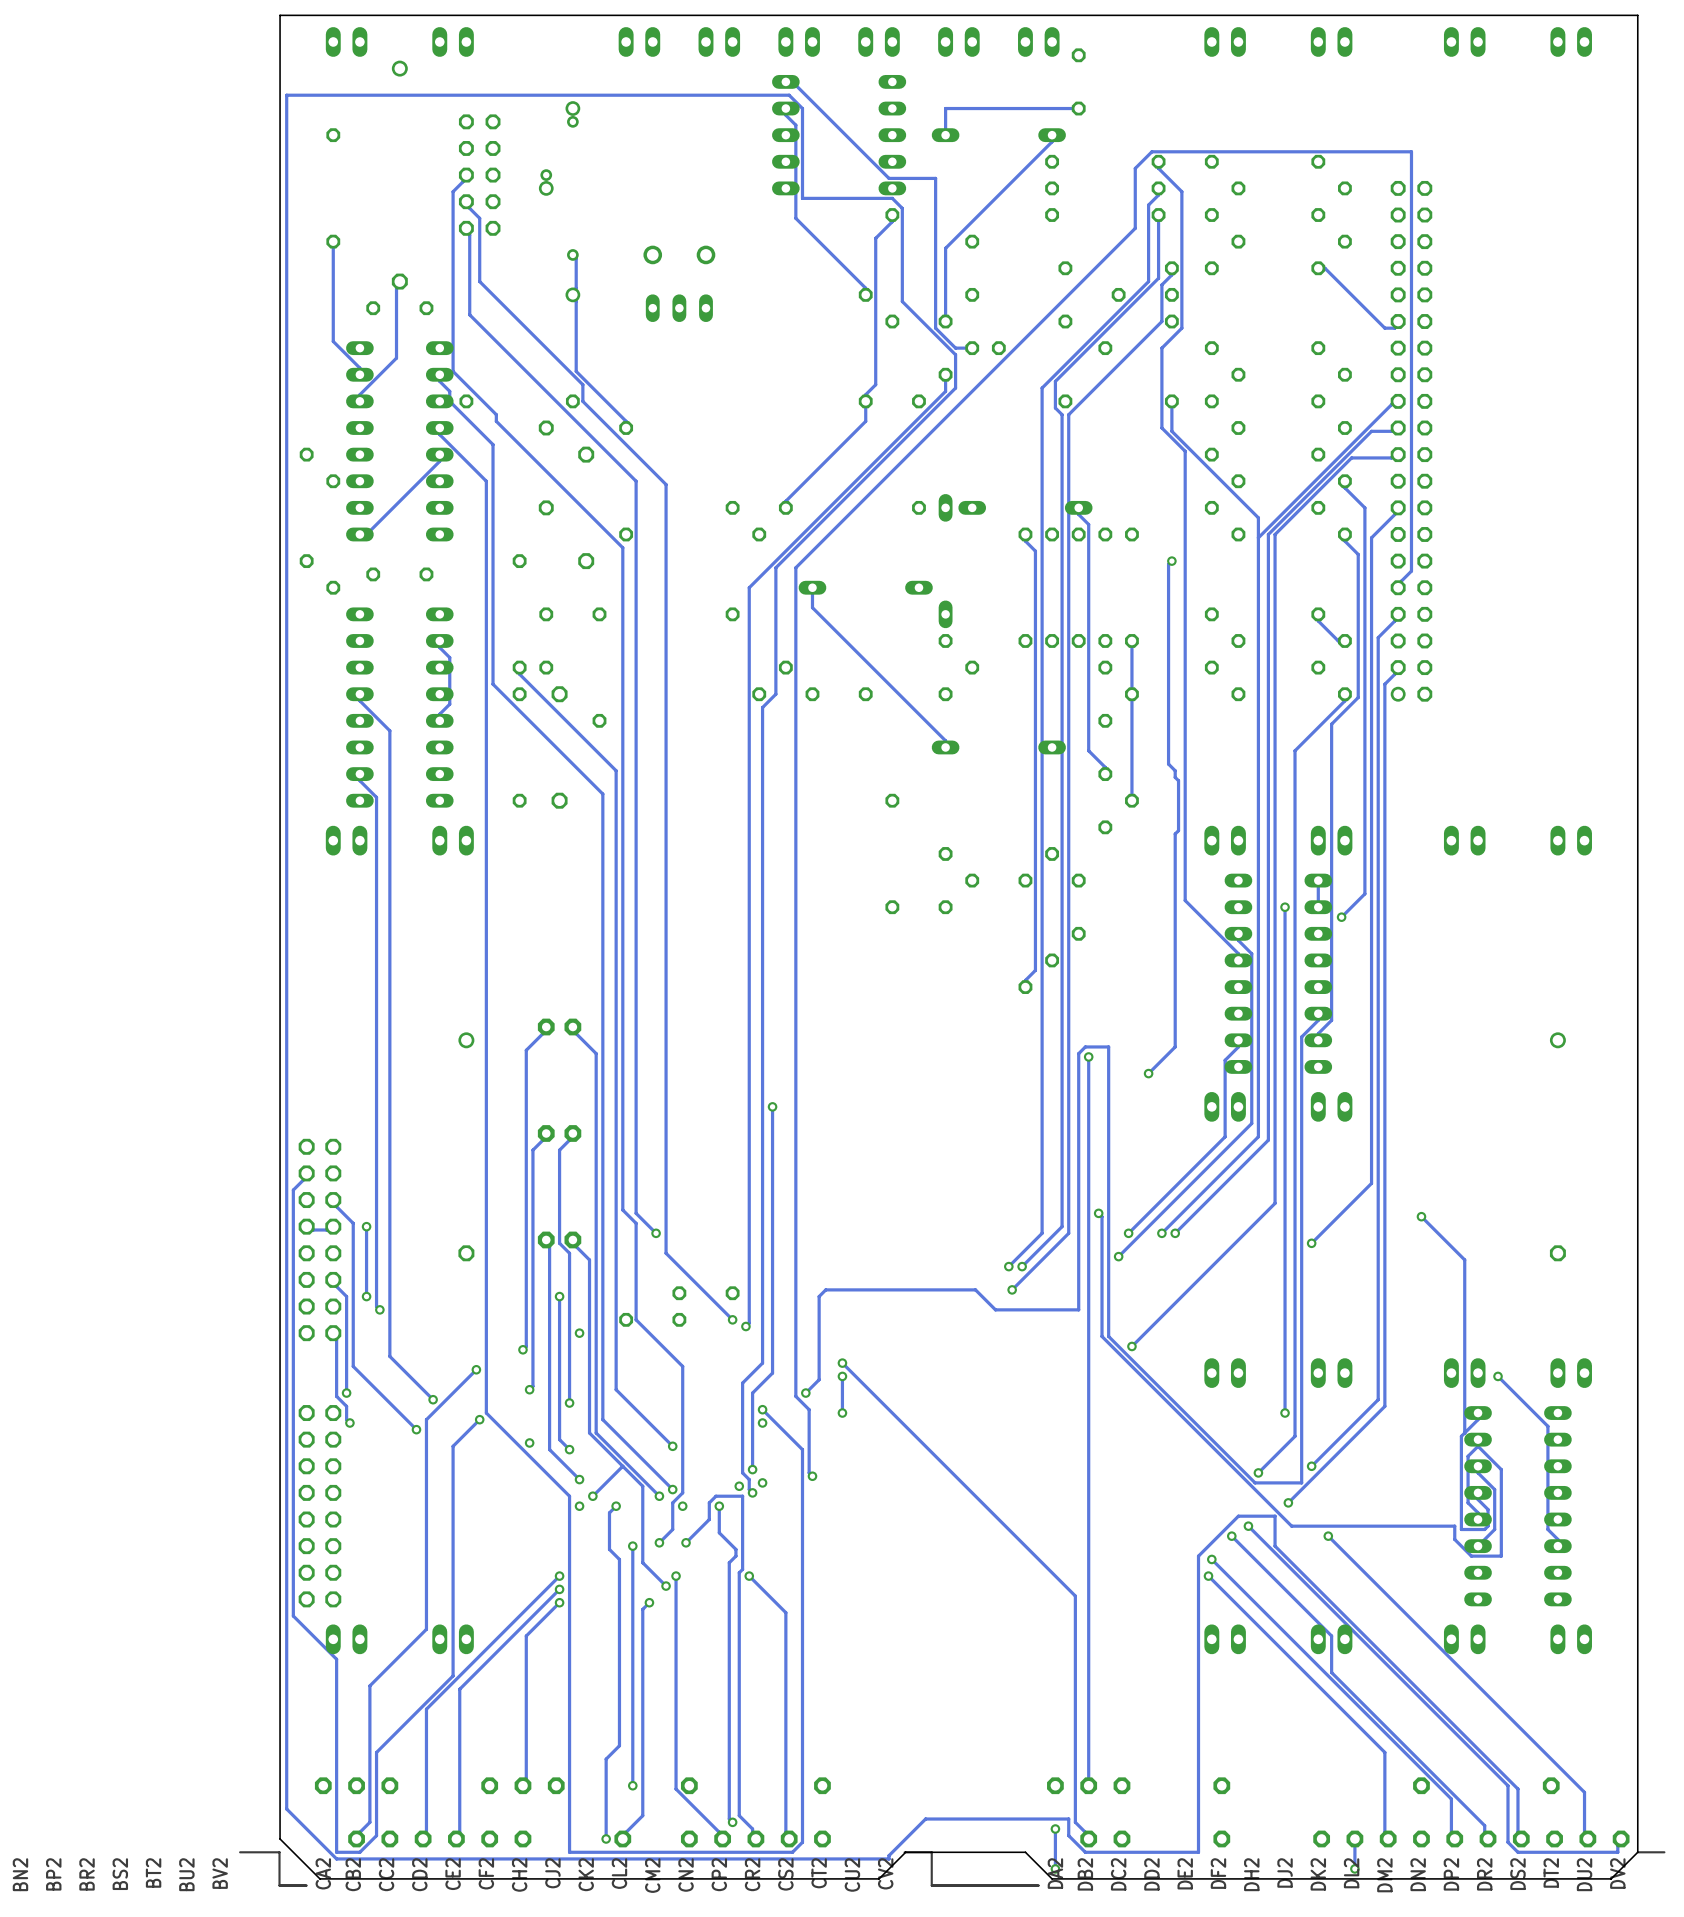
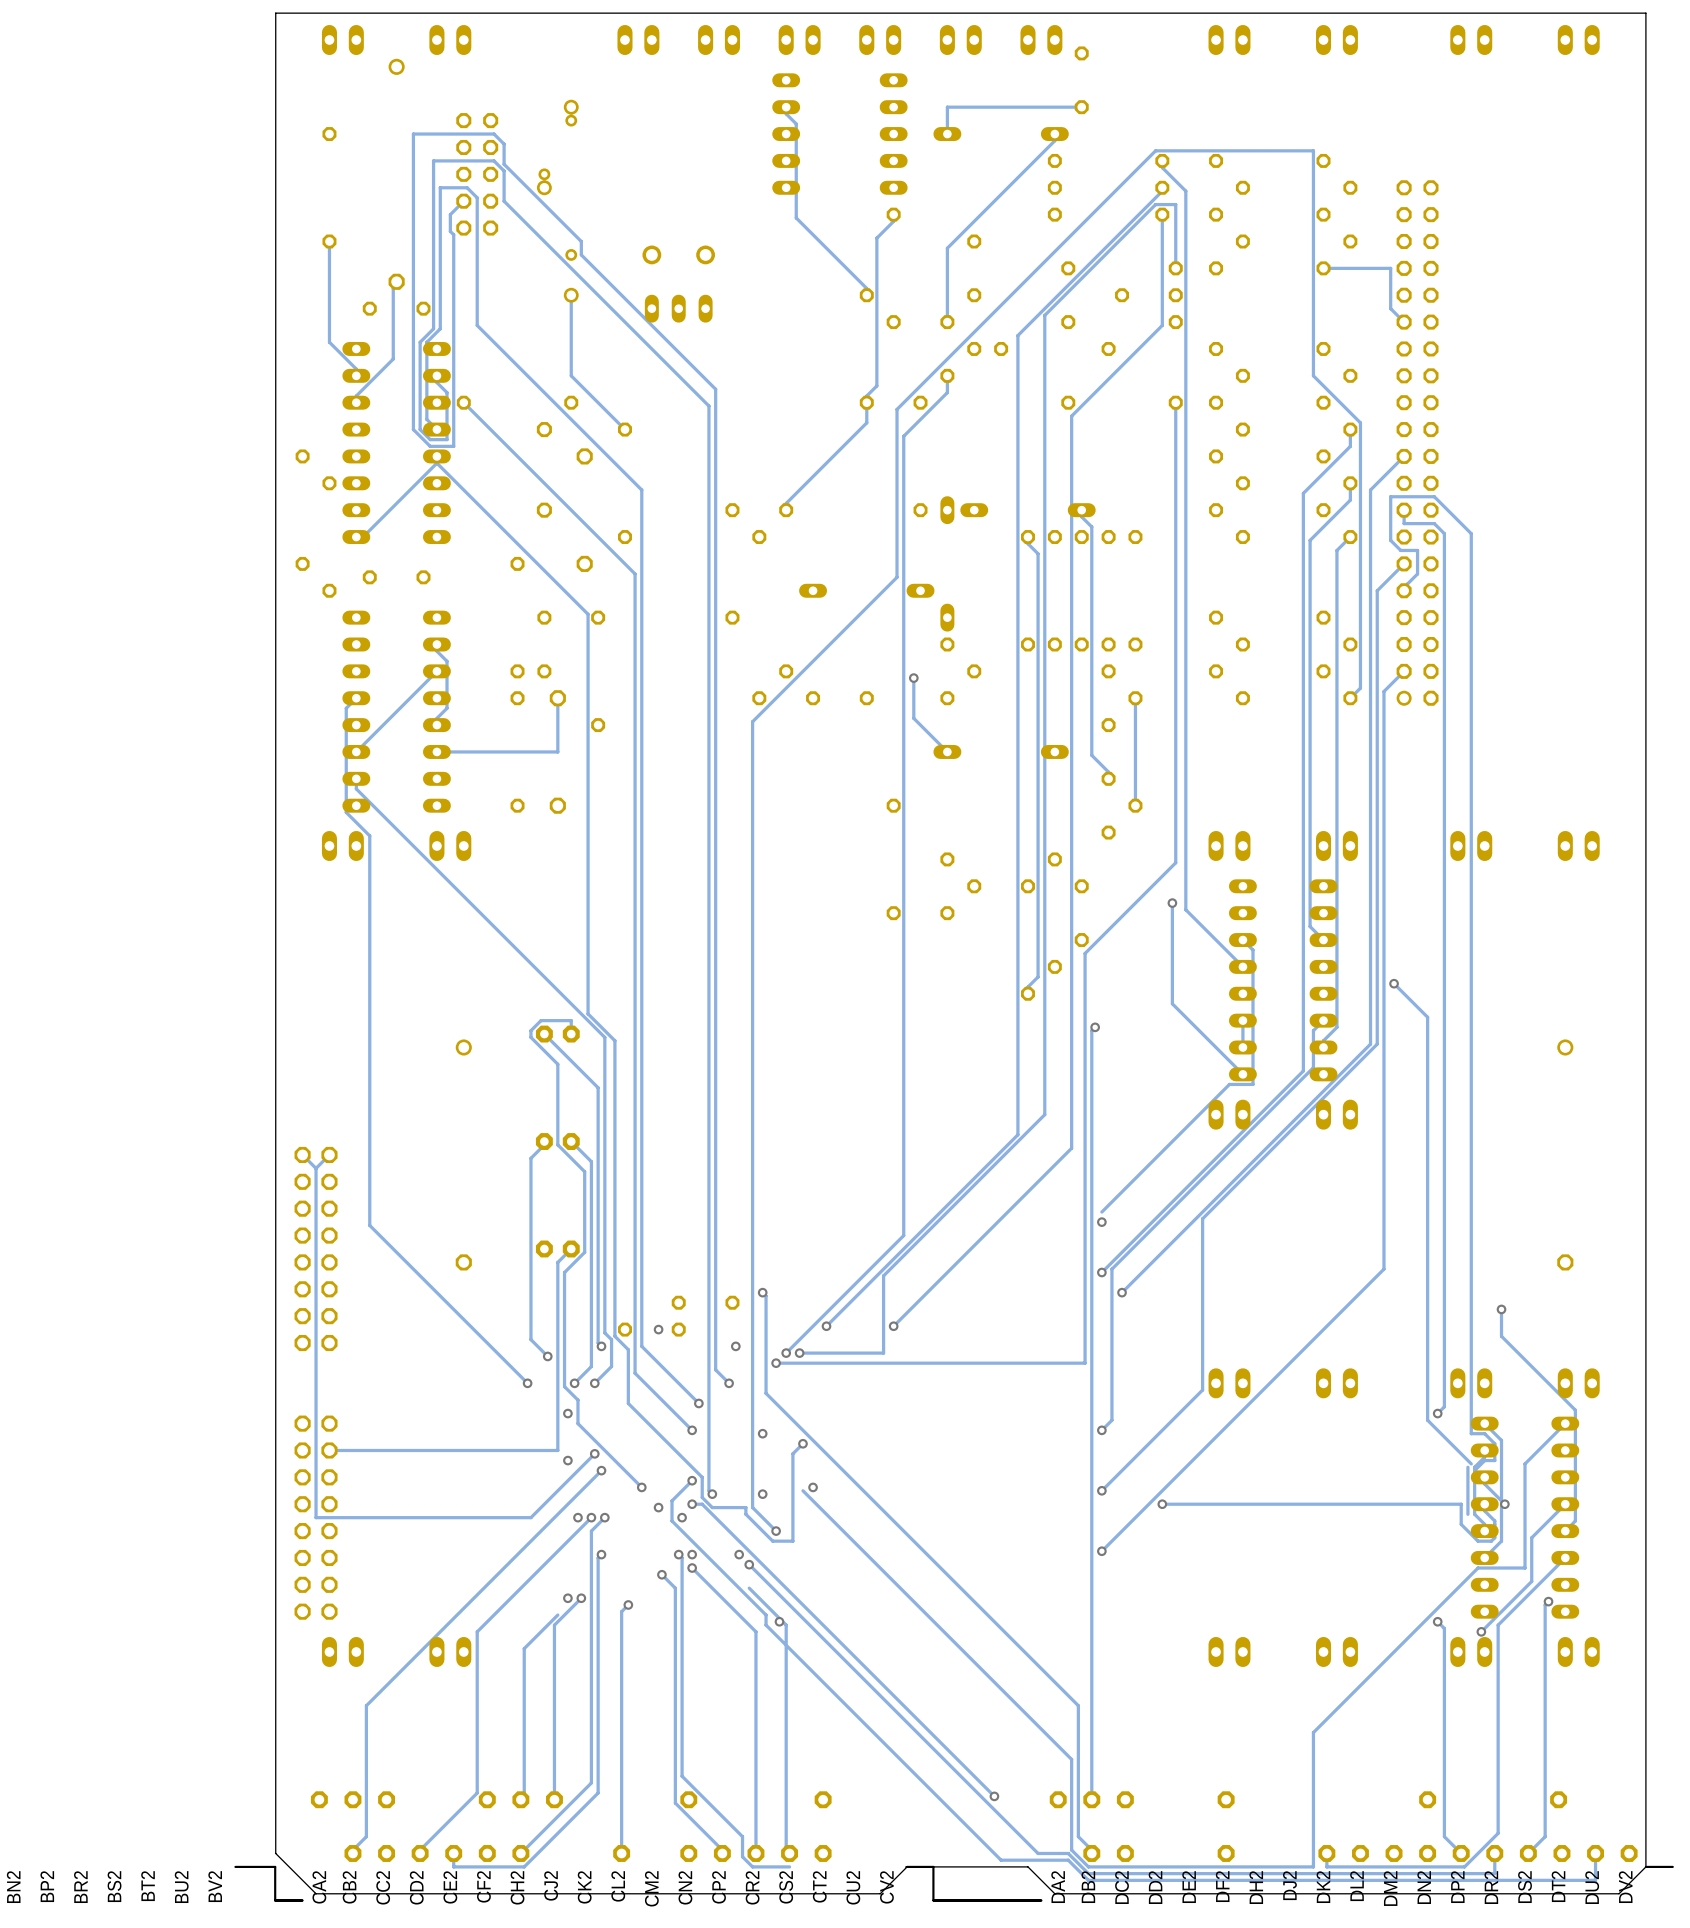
track: (785, 81) (792, 81) (889, 178) (935, 178) (935, 328) (955, 348) (972, 348) -> none
track: (1308, 151) (1411, 151) (1411, 547) -> (1313, 150) (1313, 375) (1360, 422) (1360, 688) (1350, 698)
track: (1135, 168) (1135, 228) (795, 567) (795, 1396) (809, 1409) (809, 1472) (812, 1476) -> (1138, 167) (897, 409) (897, 577) (776, 698)
track: (466, 175) (463, 181) (453, 191) (453, 215) -> (463, 201) (450, 214)
track: (1158, 191) (1158, 195) (1148, 205) (1148, 281) (1042, 388) -> (1175, 268) (1175, 204) (1155, 204) (1044, 315) (1044, 389)
track: none -> (1162, 191) (1017, 335) (1017, 1134) (826, 1326)
track: (466, 201) (469, 208) (479, 218) -> (436, 429) (426, 419) (426, 342) (440, 328) (440, 187) (467, 187) (477, 197) (477, 217)
track: (466, 228) (469, 234) (469, 314) (479, 324) -> (477, 281) (477, 325)
track: (453, 231) (453, 371) (496, 414) (496, 421) (622, 547) (622, 1210) (636, 1223) -> (450, 231) (453, 234) (453, 446) (430, 446) (413, 429) (413, 134) (494, 134) (504, 144) (504, 164) (581, 241) (581, 254) (715, 389) (715, 1369) (729, 1383)
track: (572, 254) (576, 258) (576, 288) (572, 294) (576, 301) (576, 371) (626, 421) (626, 428) -> (581, 385) (624, 429)
track: (1171, 268) (1171, 274) (1161, 284) (1161, 321) (1158, 324) -> (1162, 278) (1162, 325)
track: (1324, 268) (1384, 328) (1394, 328) (1398, 321) -> (1330, 268) (1390, 268) (1390, 308) (1404, 322)
track: (1158, 278) (1055, 381) (1055, 408) (1062, 414) (1062, 1226) (1022, 1266) -> none
track: (479, 281) (572, 374) -> (571, 295) (571, 375)
track: (1181, 328) (1161, 348) (1161, 428) (1185, 451) (1185, 900) (1238, 953) (1238, 960) -> (1185, 328) (1185, 909) (1242, 966)
track: (582, 384) (582, 401) (666, 484) (666, 1253) (732, 1319) -> none
track: (449, 401) (493, 444) (493, 684) (602, 794) (602, 1419) (672, 1489) -> (447, 402) (447, 439) (430, 439) (420, 429) (420, 342) (433, 328) (433, 160) (494, 160) (504, 170) (504, 201) (708, 406) (708, 1490) (712, 1494)
track: (1398, 401) (1391, 404) (1258, 537) -> none
track: (439, 428) (439, 434) (486, 481) (486, 1413) (569, 1496) (569, 1852) (752, 1852) -> (678, 1554) (682, 1557) (682, 1776) (742, 1836) (742, 1856) (752, 1866)
track: none -> (1350, 429) (1350, 446) (1303, 493) (1303, 1071) (1229, 1144)
track: (1398, 428) (1391, 431) (1371, 431) (1268, 534) (1268, 1140) -> none
track: (1171, 431) (1258, 517) (1258, 1136) (1161, 1233) -> (1175, 432) (1175, 862) (1085, 953) (1085, 1363) (776, 1363)
track: (902, 434) (749, 587) (749, 1323) (745, 1326) -> (903, 436) (903, 1235) (786, 1353)
track: (1398, 454) (1391, 457) (1351, 457) (1275, 534) (1275, 1203) (1131, 1346) -> none
track: (636, 481) (636, 571) -> (463, 402) (635, 573)
track: none -> (635, 483) (641, 490) (641, 1346) (698, 1403)
track: (1344, 487) (1364, 507) -> (1404, 456) (1370, 490) (1370, 510)
track: none -> (1350, 490) (1350, 500) (1310, 540) (1310, 926) (1323, 940)
track: (1398, 507) (1394, 514) (1371, 537) (1371, 587) -> (1404, 563) (1377, 590)
track: none -> (1404, 510) (1404, 523) (1434, 523) (1444, 533) (1444, 1406) (1437, 1413)
track: (1344, 534) (1344, 541) (1358, 554) (1358, 697) (1331, 724) -> (1350, 537) (1336, 550) (1336, 728)
track: (1171, 561) (1168, 564) (1168, 764) (1175, 770) (1175, 777) (1178, 780) (1178, 830) (1175, 833) (1175, 1046) (1148, 1073) -> none
via: (1171, 561) -> none
track: (812, 587) (812, 607) (945, 740) (945, 747) -> (913, 678) (913, 718) (947, 751)
track: (1318, 614) (1318, 621) (1338, 640) (1344, 640) -> none
track: (1398, 614) (1394, 621) (1378, 637) (1378, 687) -> (1404, 671) (1383, 691)
track: (1131, 640) (1131, 694) -> none
track: none -> (436, 671) (356, 751)
track: (519, 667) (519, 674) (616, 770) (616, 1033) -> (433, 459) (588, 614) (588, 1013) (614, 1040)
track: (1398, 667) (1394, 674) (1384, 684) (1384, 1406) (1288, 1502) -> none
via: none -> (913, 678)
track: (359, 694) (359, 700) (389, 730) (389, 1356) (433, 1399) -> (356, 698) (346, 708) (346, 812) (369, 835) (369, 1225) (527, 1383)
track: none -> (557, 698) (557, 751) (436, 751)
track: (775, 694) (775, 567) (955, 388) (955, 354) (902, 301) (902, 208) (892, 198) (802, 198) (802, 108) (789, 95) (286, 95) (286, 1809) (336, 1858) (889, 1858) (889, 1855) (925, 1819) (1068, 1819) -> (802, 1490) (1071, 1759) (1071, 1833)
track: (1344, 694) (1344, 700) (1295, 750) (1295, 1436) (1258, 1472) -> none
track: (762, 707) (762, 1363) (742, 1383) (742, 1472) (749, 1479) (749, 1489) (752, 1492) -> (762, 711) (752, 721) (752, 1403)
track: (359, 780) (376, 797) (376, 1306) (379, 1309) -> (356, 785) (356, 788) (604, 1037) (604, 1332) (611, 1339) (611, 1366) (594, 1383)
track: (1318, 880) (1318, 907) -> none
track: (1364, 893) (1341, 917) -> (1370, 899) (1370, 1044) (1122, 1292)
track: none -> (1172, 903) (1172, 1003) (1242, 1074)
via: none -> (1172, 903)
track: (1285, 907) (1285, 1413) -> none
via: (1285, 907) -> none
via: (1341, 917) -> none
track: (1238, 933) (1238, 940) (1251, 953) (1251, 1123) (1118, 1256) -> (1242, 940) (1252, 950) (1252, 1084) (1229, 1084) (1101, 1212)
track: none -> (1394, 983) (1427, 1017) (1427, 1420) (1471, 1463)
via: none -> (1394, 983)
track: (1318, 1013) (1318, 1020) (1301, 1036) (1301, 1482) (1255, 1482) (1108, 1336) -> (1323, 1020) (1313, 1030) (1313, 1067) (1111, 1269)
track: none -> (1095, 1027) (1091, 1030) (1091, 1064)
track: (546, 1027) (542, 1033) (526, 1050) (526, 1346) (522, 1349) -> (544, 1034) (598, 1087) (598, 1343) (601, 1346)
track: (572, 1027) (576, 1033) (596, 1053) (596, 1432) (659, 1496) -> (571, 1034) (571, 1020) (541, 1020) (530, 1030) (530, 1037) (557, 1064) (557, 1144) (584, 1171) (584, 1252) (564, 1272) (564, 1386) (577, 1400) (577, 1423) (641, 1487)
track: (1371, 1036) (1371, 1183) (1311, 1243) -> (1377, 1044) (1273, 1148)
track: (1238, 1040) (1238, 1046) (1225, 1060) (1225, 1136) -> (1242, 1047) (1242, 1020)
via position: (1088, 1056) -> (1095, 1027)
via: (1148, 1073) -> none
track: (772, 1106) (772, 1373) (752, 1393) -> none
via: (772, 1106) -> none
track: (1042, 1106) (1042, 1233) (1008, 1266) -> (1044, 1114) (883, 1275) (883, 1353) (799, 1353)
track: (572, 1133) (569, 1140) (559, 1150) (559, 1243) (569, 1253) (569, 1403) -> (571, 1141) (591, 1161) (591, 1366) (574, 1383)
track: (1068, 1140) (1068, 1233) (1012, 1289) -> (1071, 1148) (893, 1326)
track: none -> (302, 1154) (316, 1168)
track: none -> (329, 1154) (316, 1168)
track: none -> (316, 1168) (316, 1517) (530, 1517) (594, 1453)
track: (306, 1173) (303, 1180) (293, 1190) (293, 1616) (336, 1659) (336, 1852) (359, 1852) (376, 1835) (376, 1752) (453, 1675) (453, 1446) (479, 1419) -> none
track: (333, 1200) (336, 1206) (353, 1223) (353, 1366) (416, 1429) -> none
track: (1198, 1210) (1175, 1233) -> (1202, 1218) (1202, 1390) (1101, 1490)
track: (636, 1213) (656, 1233) -> (635, 1222) (635, 1232)
track: (1098, 1213) (1102, 1216) (1102, 1336) (1291, 1526) (1454, 1526) (1454, 1539) (1471, 1556) -> none
track: (1421, 1216) (1464, 1259) -> (1417, 550) (1400, 550) (1390, 540) (1390, 496) (1434, 496) (1471, 533) (1471, 1269)
via: (1421, 1216) -> none
track: (333, 1226) (326, 1229) (313, 1229) (306, 1226) -> none
track: (366, 1226) (366, 1296) -> none
via: (366, 1226) -> none
via: (656, 1233) -> none
track: none -> (1132, 1242) (1101, 1272)
via: (1128, 1233) -> none
via: (1161, 1233) -> none
via: (1175, 1233) -> none
track: (546, 1239) (549, 1246) (549, 1449) (579, 1479) -> none
track: (572, 1239) (576, 1246) (589, 1259) (589, 1432) (642, 1486) (642, 1562) (666, 1586) -> (571, 1248) (557, 1262) (557, 1306)
via: (1311, 1243) -> none
via: (1118, 1256) -> none
track: (1108, 1259) (1108, 1046) (1085, 1046) (1078, 1053) (1078, 1309) (995, 1309) (975, 1289) (825, 1289) (819, 1296) (819, 1379) (805, 1393) -> none
track: (1378, 1259) (1378, 1399) (1311, 1466) -> (1383, 1269) (1101, 1551)
via: none -> (1101, 1272)
via: (1008, 1266) -> none
via: (1022, 1266) -> none
track: (333, 1279) (336, 1286) (346, 1296) (346, 1393) -> none
via: none -> (762, 1292)
via: none -> (1122, 1292)
via: (1012, 1289) -> none
via: (366, 1296) -> none
via: (559, 1296) -> none
track: none -> (1501, 1309) (1501, 1336) (1575, 1410) (1575, 1521) (1565, 1531)
via: none -> (1501, 1309)
via: (379, 1309) -> none
via: none -> (826, 1326)
via: none -> (893, 1326)
track: (636, 1319) (682, 1366) (682, 1492) (672, 1502) -> (635, 1329) (635, 1373) (692, 1430)
via: none -> (658, 1329)
via: (732, 1319) -> none
track: (616, 1326) (616, 1389) (672, 1446) -> (614, 1336) (628, 1349) (628, 1403) (702, 1477) (702, 1497) (712, 1507) (715, 1507)
via: (745, 1326) -> none
track: (532, 1329) (532, 1386) (529, 1389) -> (530, 1339) (547, 1356)
track: (333, 1333) (336, 1339) (336, 1396) (346, 1406) (346, 1419) (349, 1423) -> none
via: (579, 1333) -> none
via: none -> (601, 1346)
via: none -> (735, 1346)
track: none -> (1111, 1346) (1111, 1420) (1101, 1430)
via: none -> (786, 1353)
via: none -> (799, 1353)
via: none -> (547, 1356)
via: (1131, 1346) -> none
via: (522, 1349) -> none
via: none -> (776, 1363)
track: (842, 1363) (1075, 1596) (1075, 1692) -> (762, 1292) (766, 1296) (766, 1393) (1078, 1705)
via: (842, 1363) -> none
track: (476, 1369) (426, 1419) (426, 1629) (369, 1685) (369, 1692) -> (601, 1470) (366, 1705)
via: (476, 1369) -> none
via: none -> (527, 1383)
via: none -> (574, 1383)
via: none -> (594, 1383)
via: none -> (729, 1383)
track: (842, 1376) (842, 1413) -> none
via: (842, 1376) -> none
track: (1498, 1376) (1547, 1426) (1547, 1529) (1557, 1539) (1557, 1546) -> (1326, 1853) (1326, 1866) (1464, 1866) (1498, 1833) (1498, 1625) (1565, 1557)
via: (1498, 1376) -> none
via: (529, 1389) -> none
via: (346, 1393) -> none
via: none -> (698, 1403)
via: (805, 1393) -> none
via: (433, 1399) -> none
via: none -> (1437, 1413)
track: (762, 1409) (802, 1449) (802, 1842) (792, 1852) (789, 1852) -> none
via: (762, 1409) -> none
via: (842, 1413) -> none
via: (1285, 1413) -> none
track: (1478, 1413) (1478, 1419) (1461, 1436) (1461, 1456) -> (1484, 1423) (1501, 1440) (1501, 1500) (1504, 1504)
via: (479, 1419) -> none
via: none -> (692, 1430)
via: none -> (1101, 1430)
via: (349, 1423) -> none
track: (1464, 1423) (1464, 1432) -> (1471, 1433) (1484, 1433) (1494, 1443) (1494, 1460) (1484, 1460) (1474, 1470)
via: (416, 1429) -> none
track: none -> (802, 1443) (792, 1453) (792, 1541) (772, 1541) (745, 1514) (745, 1507) (742, 1507)
via: none -> (802, 1443)
track: (559, 1439) (569, 1449) -> (557, 1450) (329, 1450)
via: (529, 1442) -> none
via: none -> (594, 1453)
via: (672, 1446) -> none
track: (1478, 1446) (1501, 1469) (1501, 1556) -> (1565, 1423) (1525, 1463) (1525, 1568) (1508, 1568)
via: none -> (601, 1470)
track: (622, 1466) (592, 1496) -> none
via: (1311, 1466) -> none
track: none -> (692, 1480) (672, 1500) (672, 1514)
via: none -> (692, 1480)
track: none -> (752, 1480) (752, 1507) (776, 1531)
via: (752, 1469) -> none
via: (1258, 1472) -> none
via: none -> (641, 1487)
via: (579, 1479) -> none
via: none -> (1101, 1490)
via: none -> (712, 1494)
via: (739, 1486) -> none
via: (672, 1489) -> none
track: none -> (692, 1504) (702, 1504) (994, 1796)
via: none -> (692, 1504)
via: (752, 1492) -> none
via: none -> (1162, 1504)
via: none -> (1504, 1504)
track: none -> (1565, 1504) (1531, 1537) (1531, 1581) (1481, 1631)
via: (592, 1496) -> none
track: (715, 1496) (709, 1502) (709, 1519) (686, 1542) -> none
track: (742, 1496) (742, 1569) (739, 1572) (739, 1815) (752, 1829) (755, 1838) -> (692, 1568) (755, 1631) (755, 1853)
via: (1288, 1502) -> none
track: (1461, 1502) (1461, 1529) (1471, 1529) -> (1162, 1504) (1461, 1504) (1461, 1524) (1478, 1541)
via: none -> (591, 1517)
track: none -> (604, 1517) (591, 1531) (591, 1782) (520, 1853)
via: none -> (604, 1517)
track: (616, 1506) (609, 1512) (609, 1549) (619, 1559) (619, 1745) (606, 1759) (606, 1838) -> none
via: (616, 1506) -> none
track: (719, 1506) (719, 1532) (735, 1549) (735, 1556) (729, 1562) (729, 1819) (732, 1822) -> none
via: (719, 1506) -> none
track: (672, 1509) (672, 1529) (659, 1542) -> none
via: none -> (776, 1531)
track: (1248, 1526) (1507, 1785) (1507, 1842) (1517, 1852) (1617, 1852) (1617, 1845) (1621, 1838) -> none
via: (1248, 1526) -> none
track: (1231, 1536) (1331, 1635) (1331, 1672) (1484, 1825) (1484, 1832) (1488, 1838) -> (749, 1564) (1038, 1853) (1068, 1853) (1088, 1873) (1494, 1873) (1494, 1853)
via: (1231, 1536) -> none
track: (1328, 1536) (1584, 1792) (1584, 1832) (1587, 1838) -> (672, 1521) (766, 1615) (766, 1625) (1001, 1860) (1068, 1860) (1088, 1880) (1595, 1880) (1595, 1853)
via: (1328, 1536) -> none
via: none -> (1101, 1551)
via: none -> (601, 1554)
via: (659, 1542) -> none
via: none -> (678, 1554)
via: (686, 1542) -> none
via: none -> (692, 1554)
via: none -> (739, 1554)
track: (632, 1546) (632, 1785) -> none
via: (632, 1546) -> none
via: none -> (749, 1564)
via: none -> (692, 1568)
track: (1211, 1559) (1451, 1799) (1451, 1832) (1454, 1838) -> (1437, 1621) (1444, 1628) (1444, 1836) (1461, 1853)
via: (1211, 1559) -> none
track: none -> (661, 1574) (675, 1588)
via: none -> (661, 1574)
track: (559, 1576) (426, 1709) (426, 1832) (423, 1838) -> (591, 1517) (477, 1631) (477, 1793) (420, 1850) (420, 1853)
via: (559, 1576) -> none
via: (676, 1576) -> none
via: (749, 1576) -> none
track: (1208, 1576) (1384, 1752) (1384, 1832) (1388, 1838) -> none
via: (1208, 1576) -> none
via: none -> (567, 1598)
track: none -> (581, 1598) (554, 1625) (554, 1799)
via: none -> (581, 1598)
via: (666, 1586) -> none
track: (559, 1589) (459, 1689) (459, 1832) (456, 1838) -> (601, 1554) (598, 1557) (598, 1793) (524, 1866) (453, 1866) (453, 1853)
via: (559, 1589) -> none
track: none -> (1548, 1601) (1545, 1604) (1545, 1836) (1528, 1853)
via: none -> (1548, 1601)
via: none -> (628, 1604)
via: (559, 1602) -> none
track: (649, 1602) (642, 1609) (642, 1815) (626, 1832) (622, 1838) -> (628, 1604) (621, 1611) (621, 1853)
via: (649, 1602) -> none
via: none -> (779, 1621)
via: none -> (1437, 1621)
via: none -> (1481, 1631)
via: none -> (994, 1796)
via: (632, 1785) -> none
via: (732, 1822) -> none
track: (1055, 1829) (1055, 1868) -> none
via: (1055, 1829) -> none
via: (606, 1838) -> none
track: (1354, 1838) (1354, 1868) -> none
track: (1521, 1838) (1517, 1832) (1517, 1789) (1275, 1546) (1275, 1516) (1238, 1516) (1198, 1556) (1198, 1852) -> (1478, 1568) (1313, 1732) (1313, 1866) (1202, 1866)
via: (1055, 1868) -> none
via: (1354, 1868) -> none

